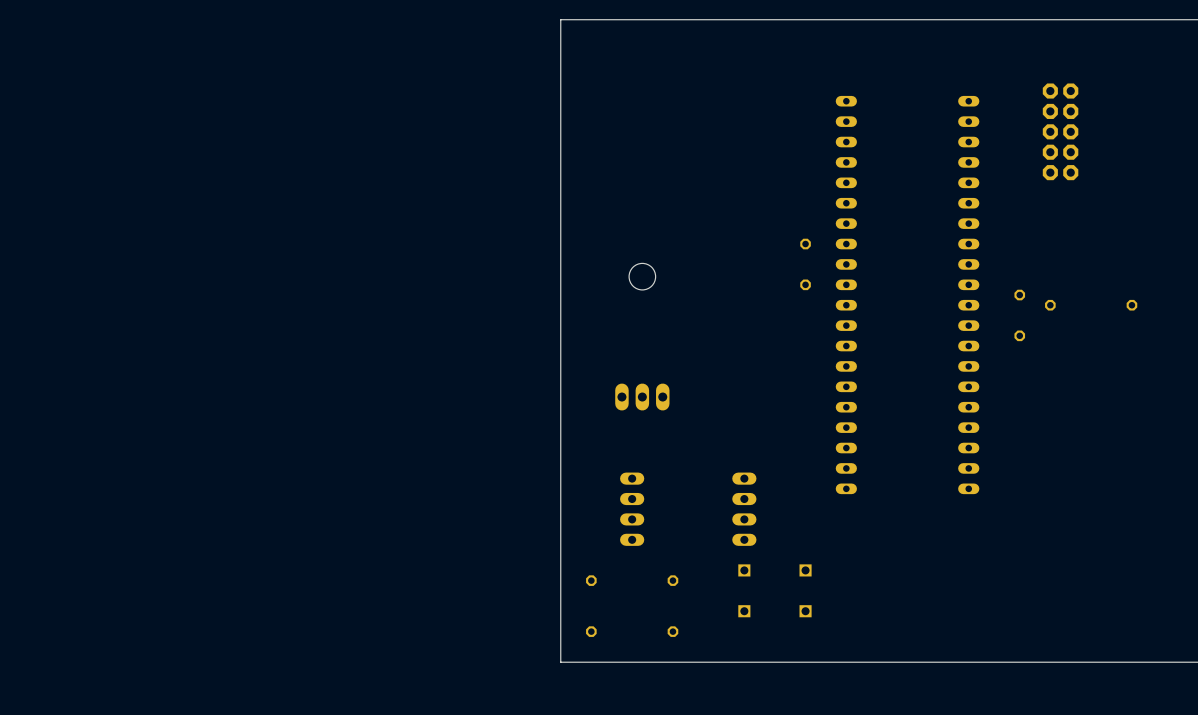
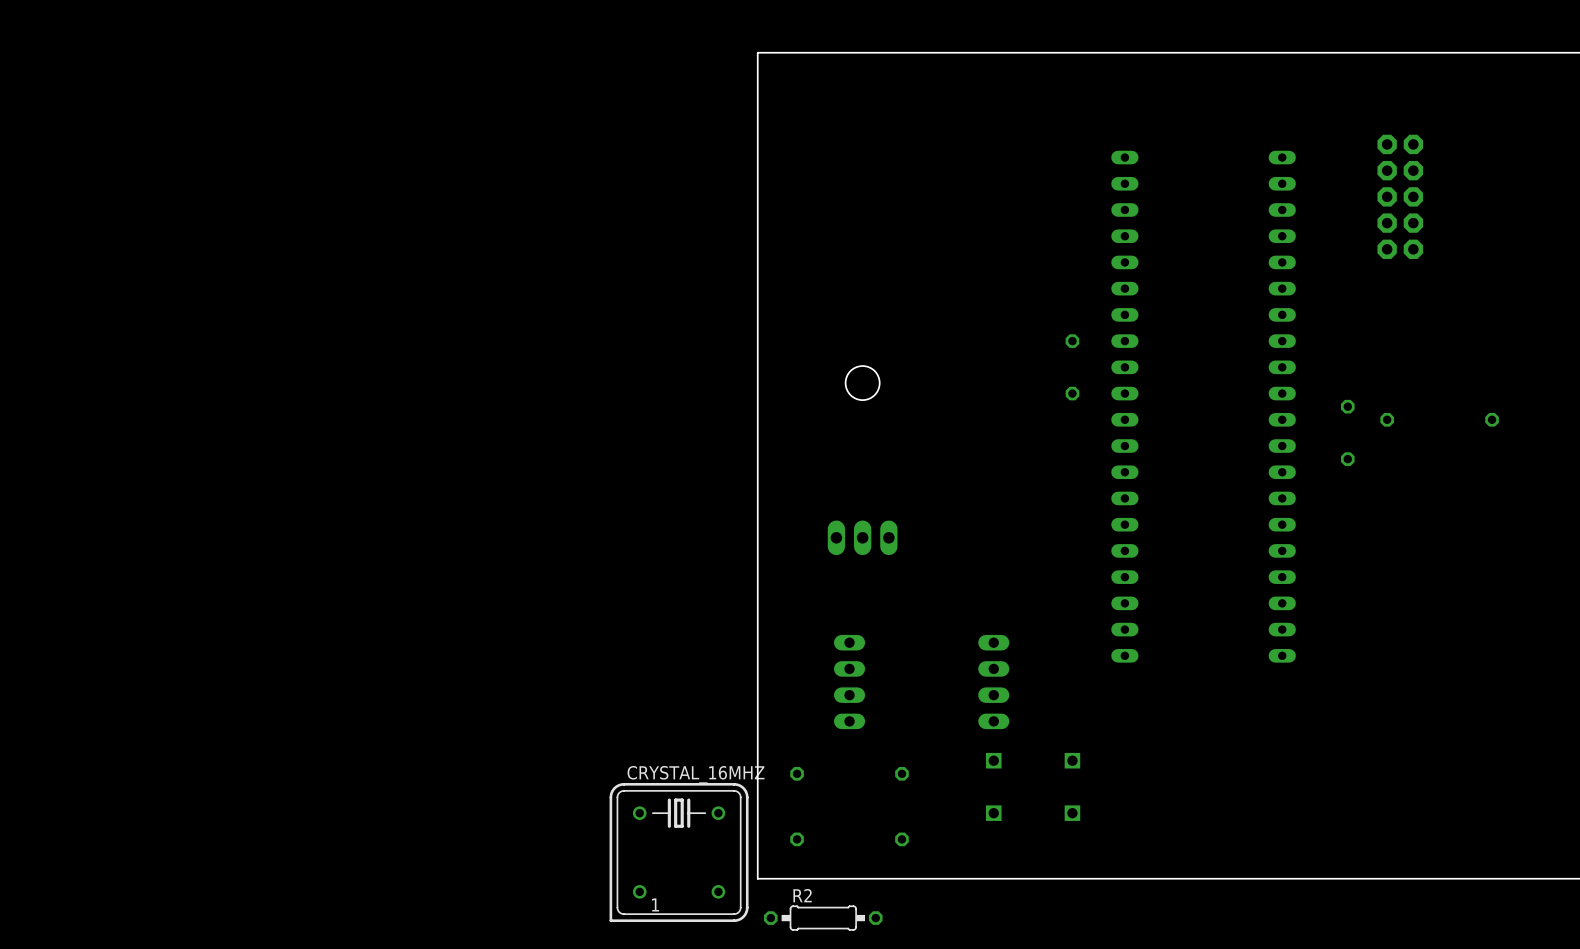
CRYSTAL_16MHZ: none -> (679, 852)
R2: none -> (823, 918)

